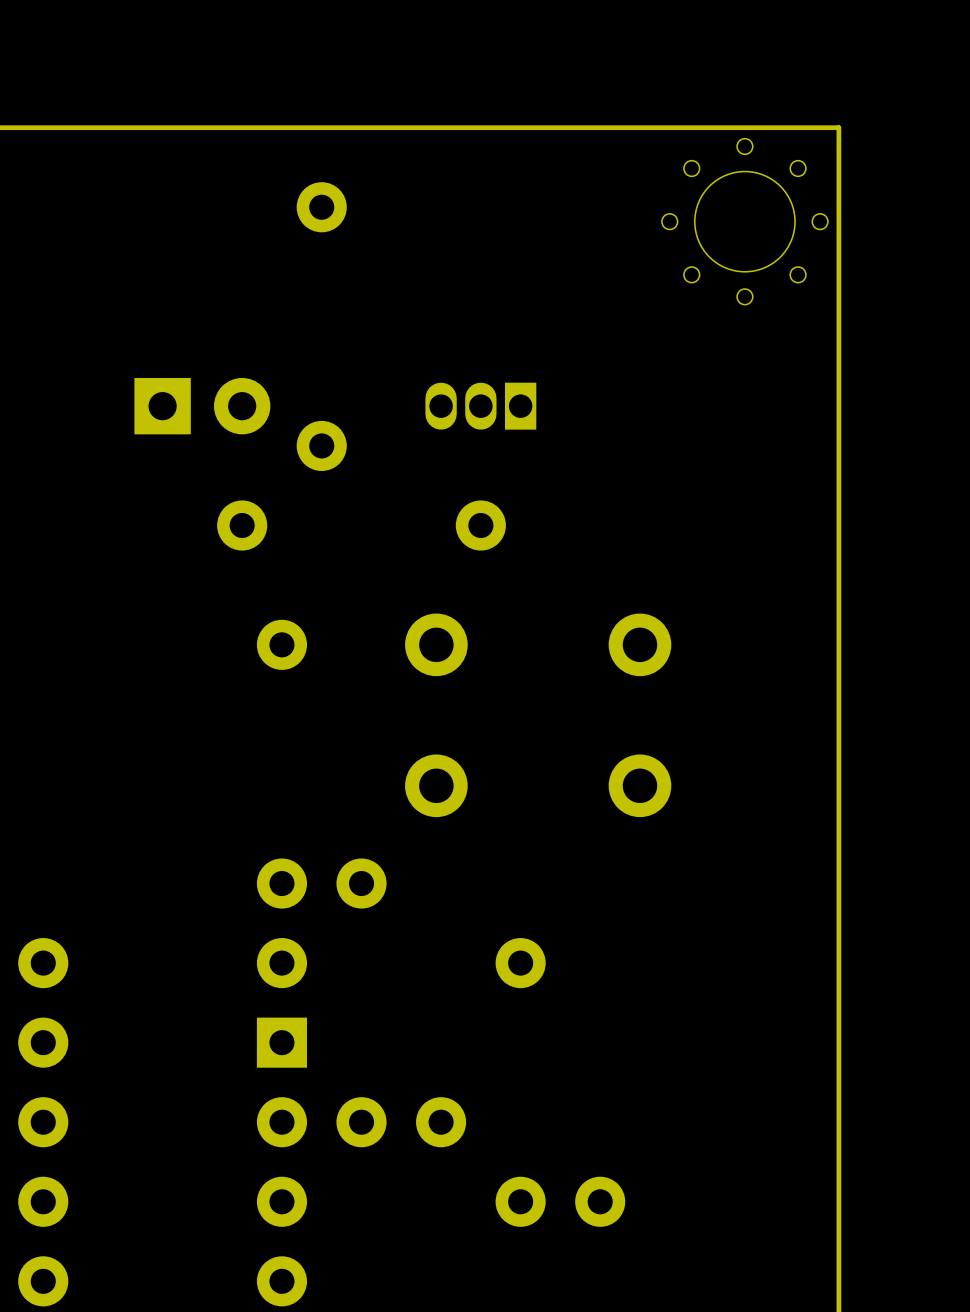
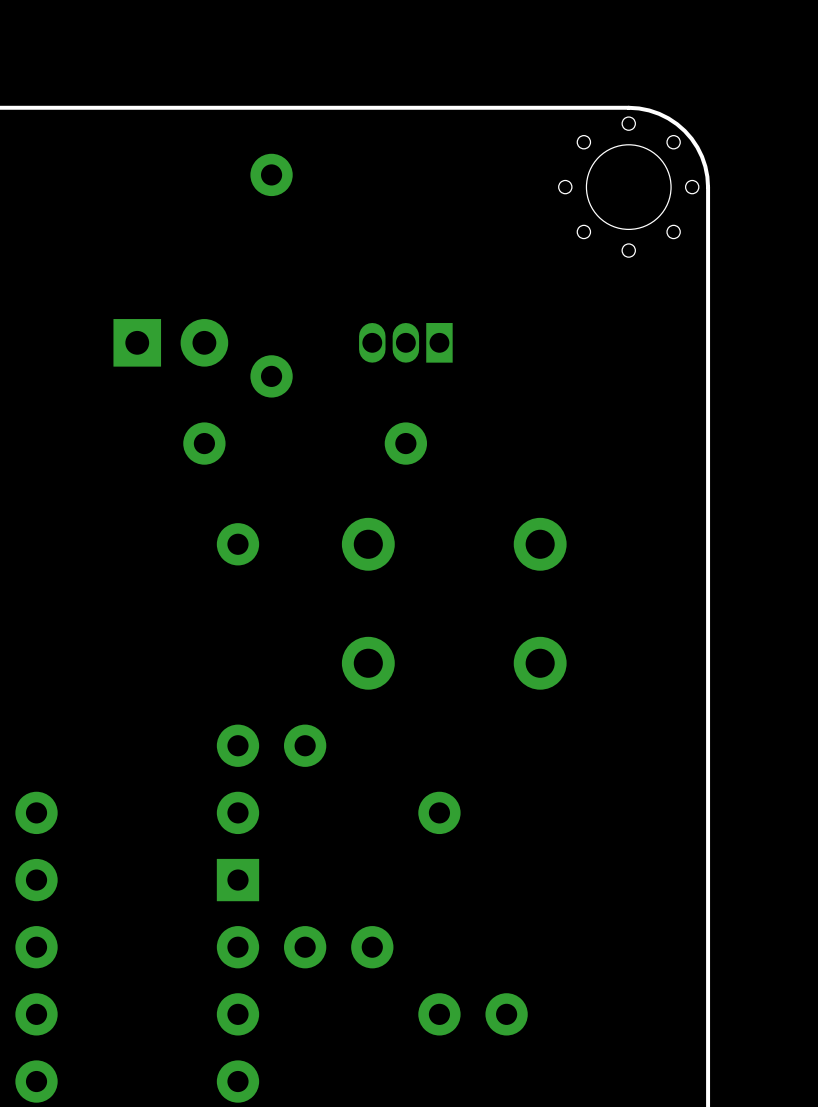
board edge: (744, 127) (838, 127) (838, 221) -> (628, 107) (659, 113) (684, 131) (702, 156) (708, 187)

